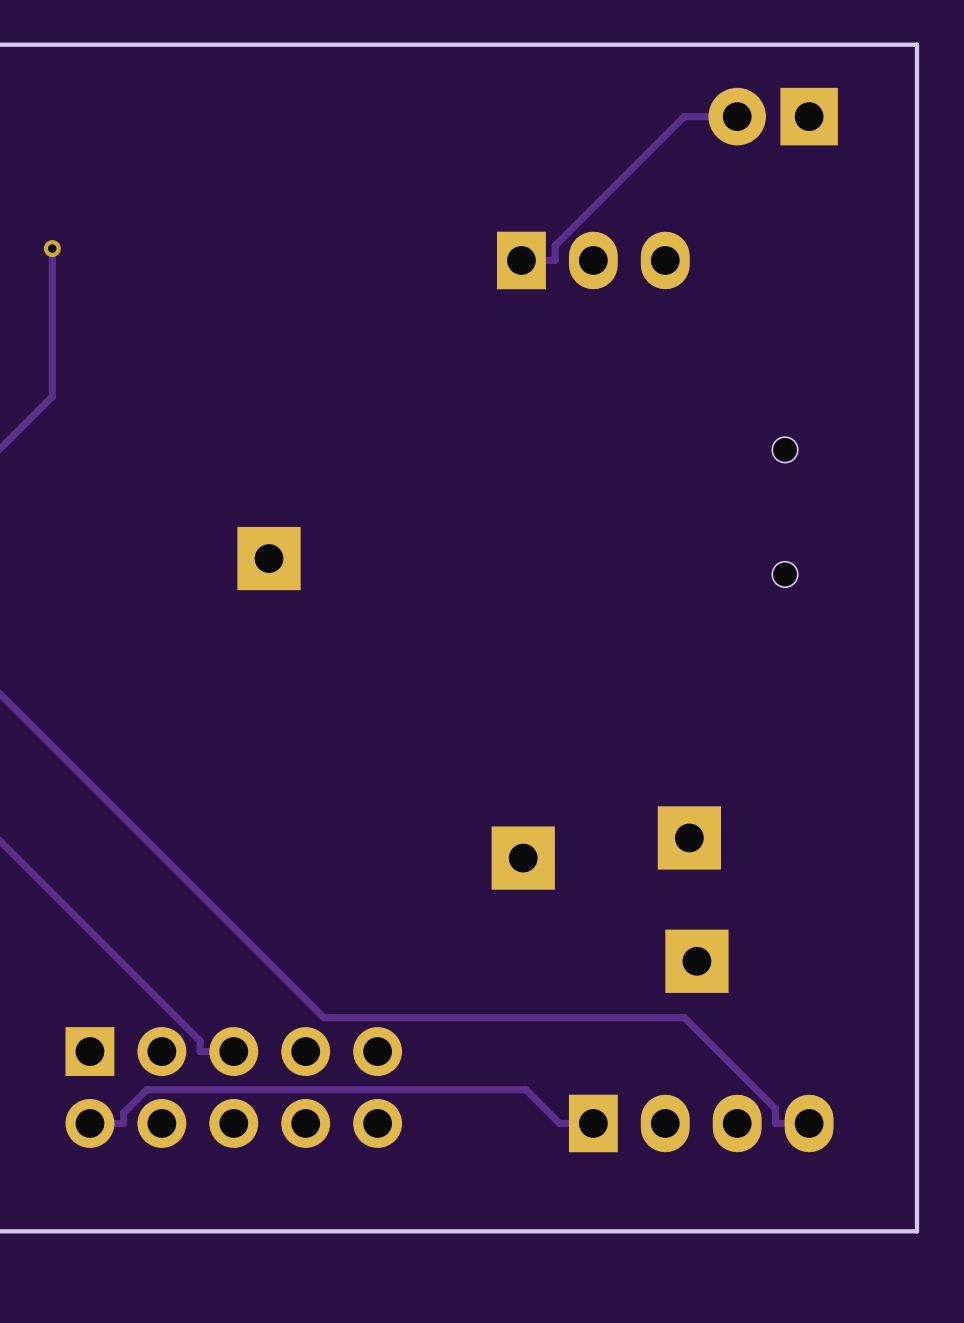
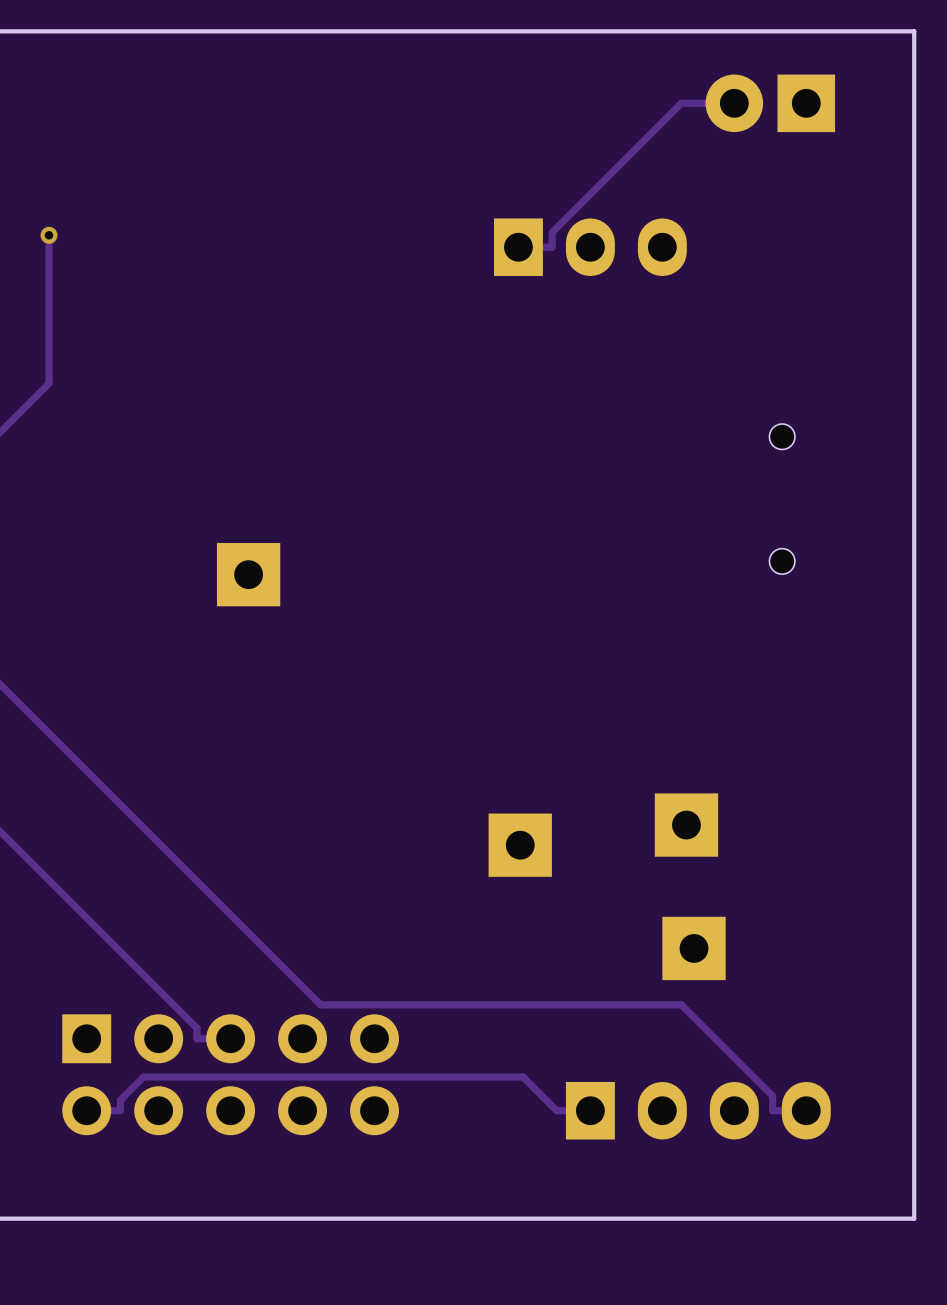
part position: (269, 558) -> (248, 574)

